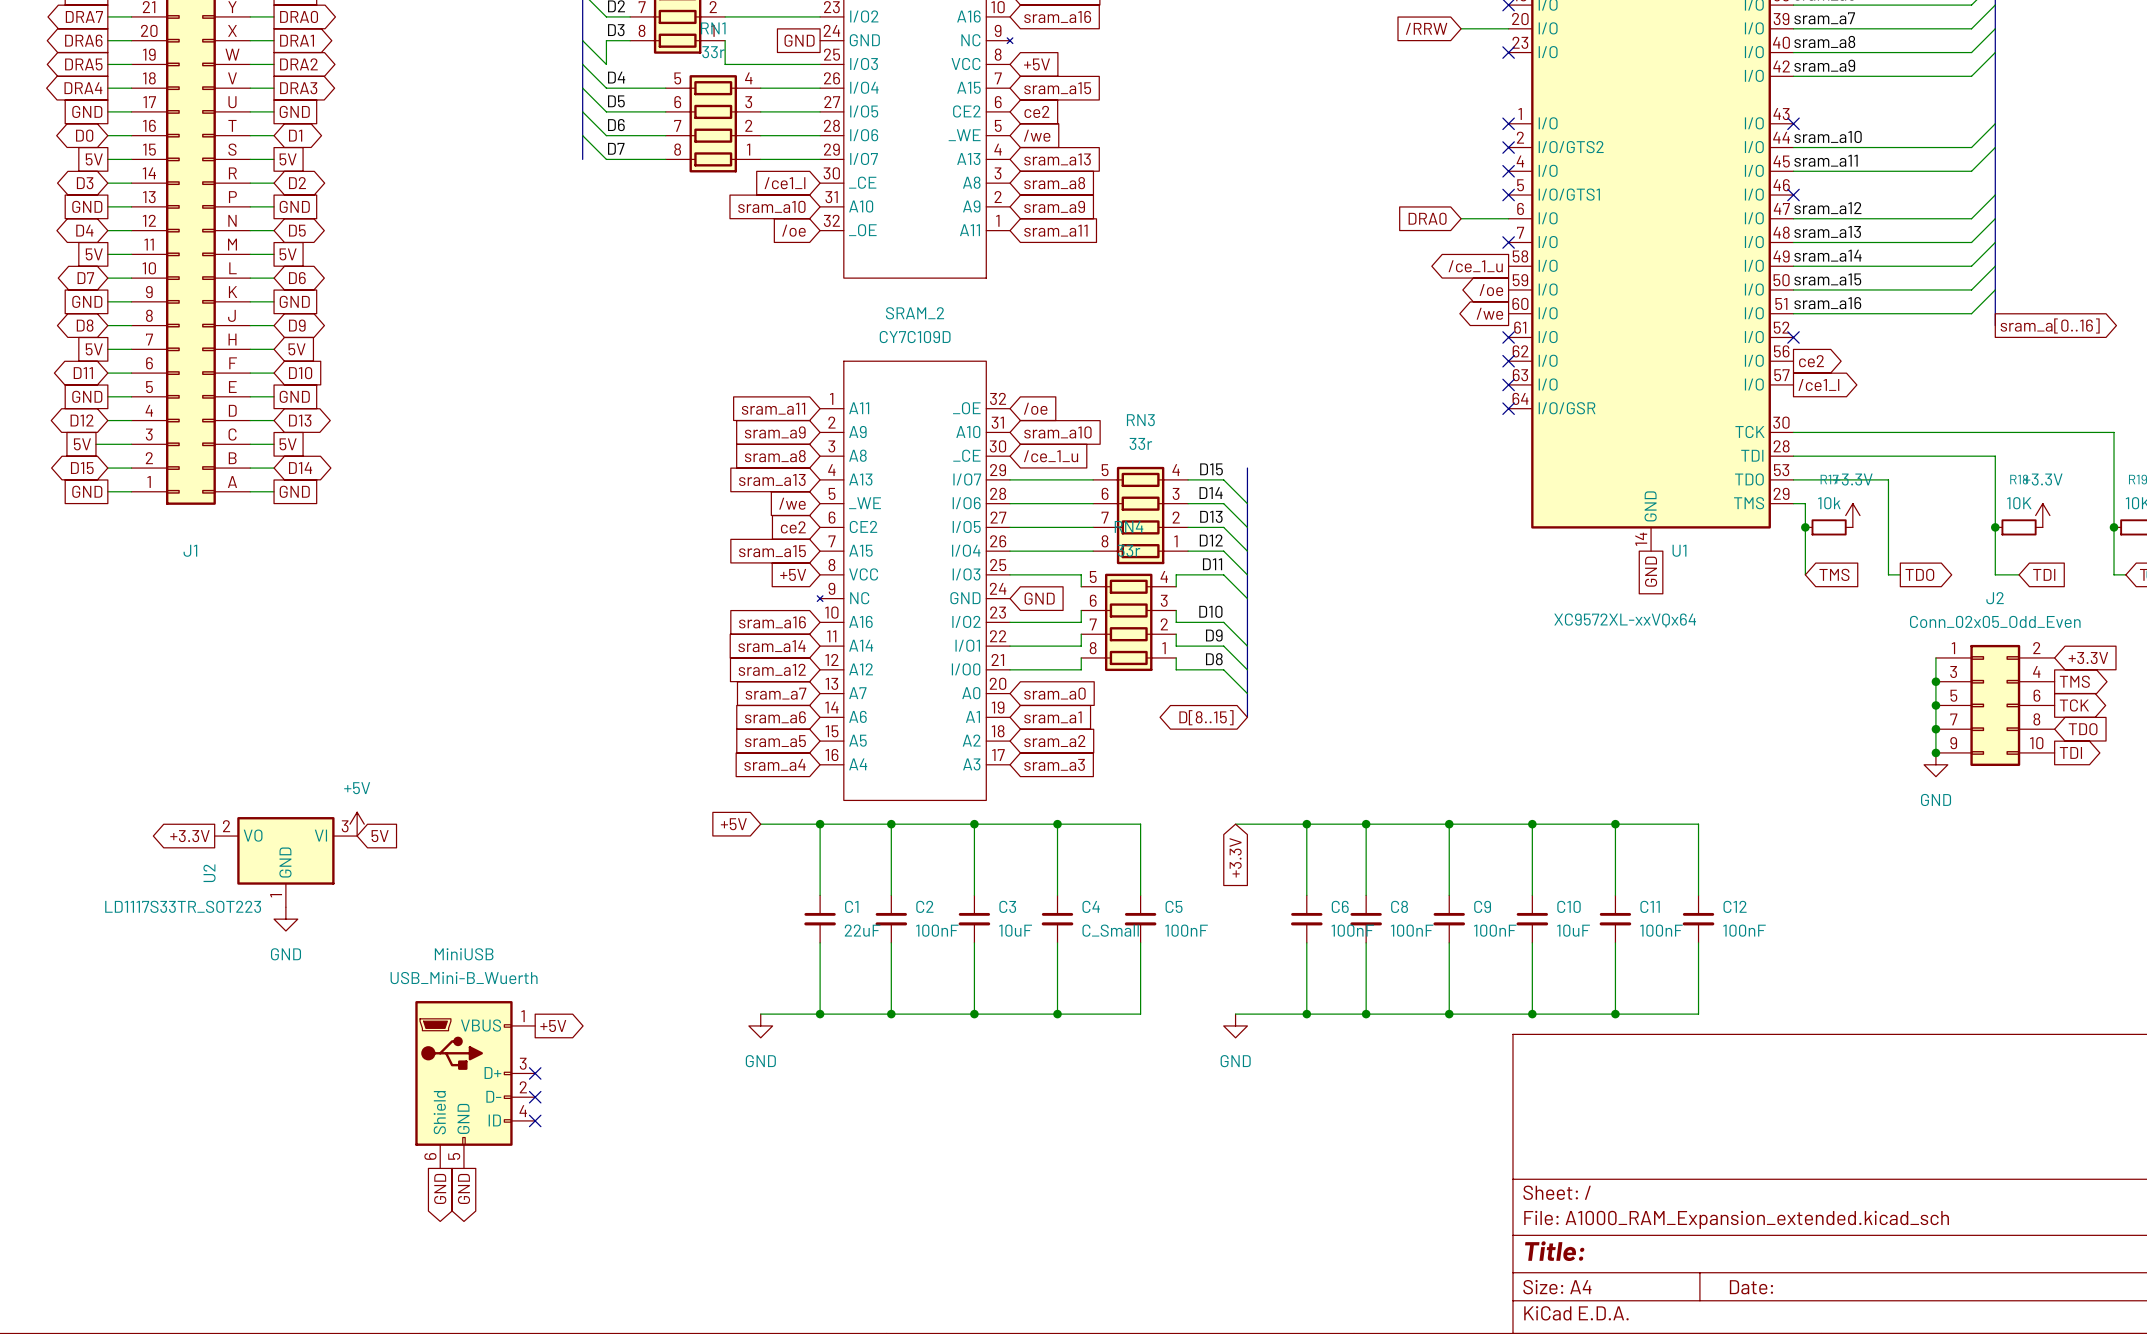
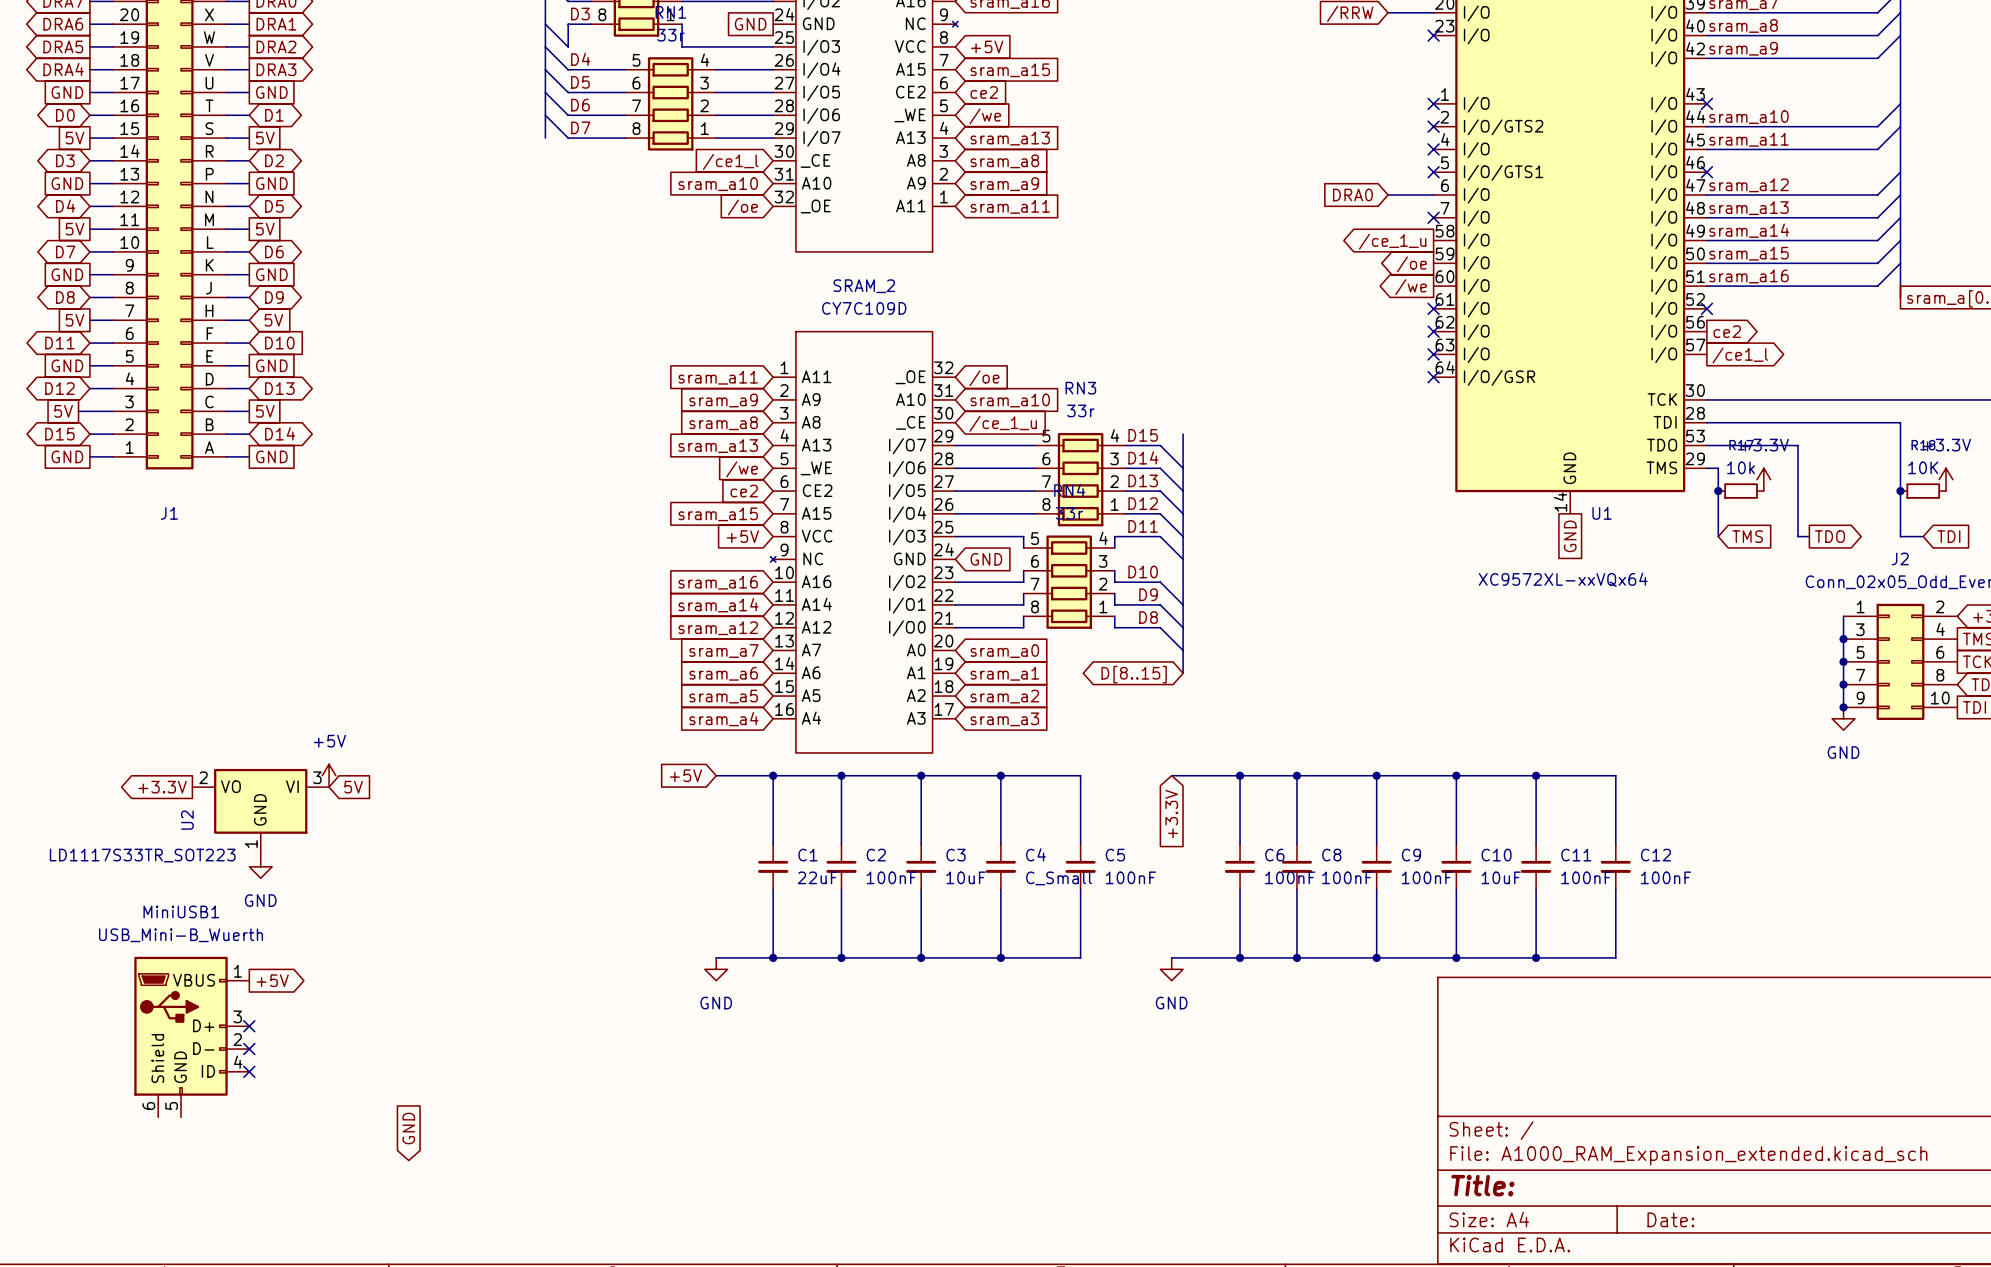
global label: +5V (553, 1026) -> none
global label: none -> +5V (272, 980)
no-connect mark: (535, 1073) -> none
MiniUSB: USB_Mini-B_Wuerth (475, 1084) -> none
no-connect mark: none -> (249, 1026)
MiniUSB1: none -> USB_Mini-B_Wuerth (191, 1037)
no-connect mark: (535, 1097) -> none
no-connect mark: none -> (249, 1049)
no-connect mark: (535, 1120) -> none
no-connect mark: none -> (249, 1071)
global label: GND (463, 1188) -> none

